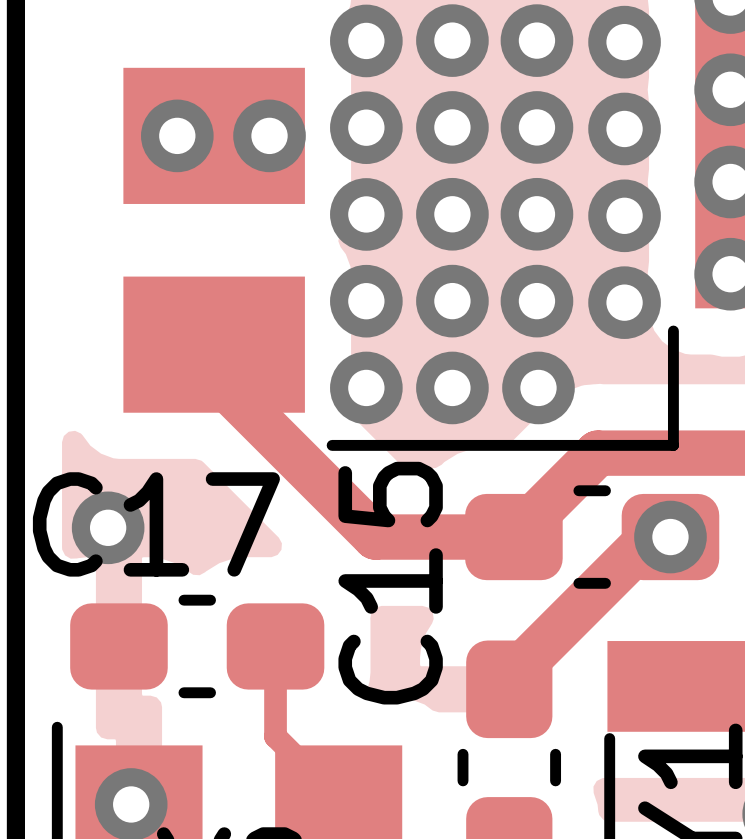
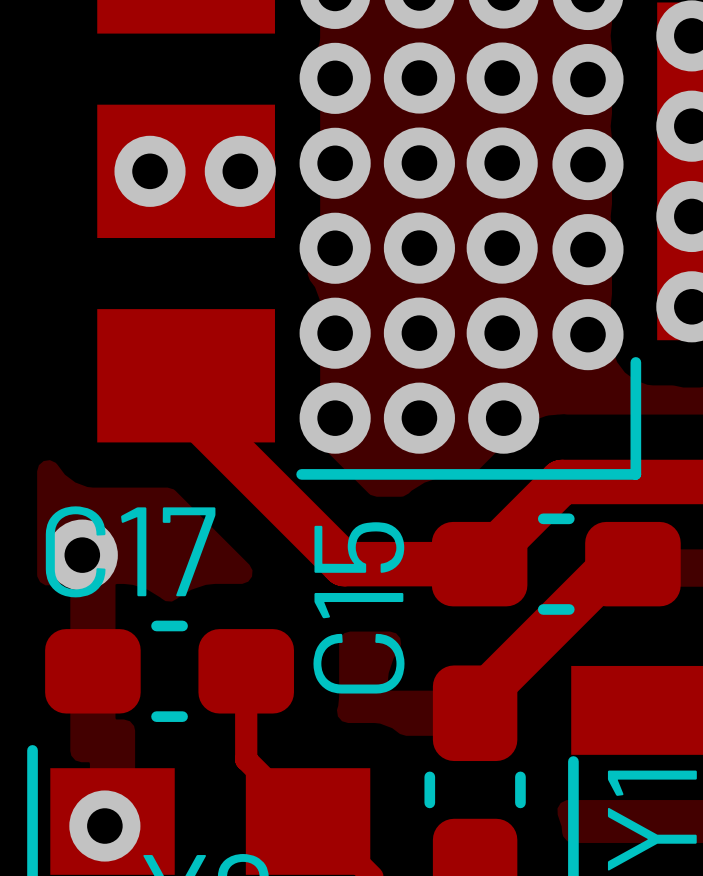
via: (670, 537) -> none

